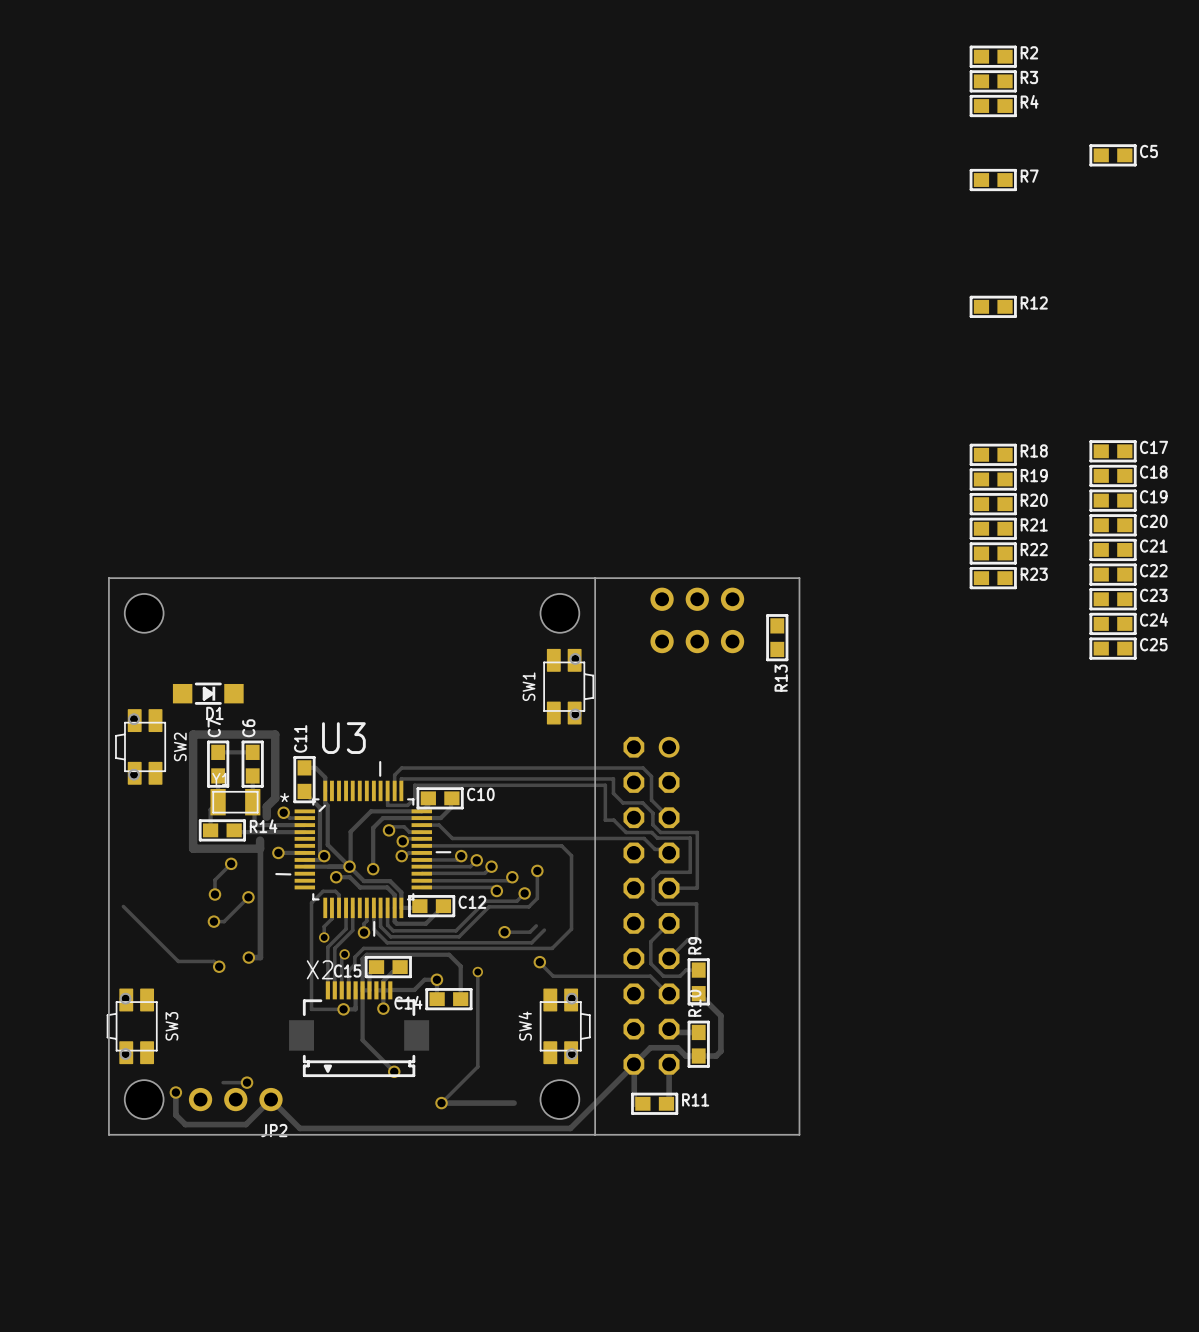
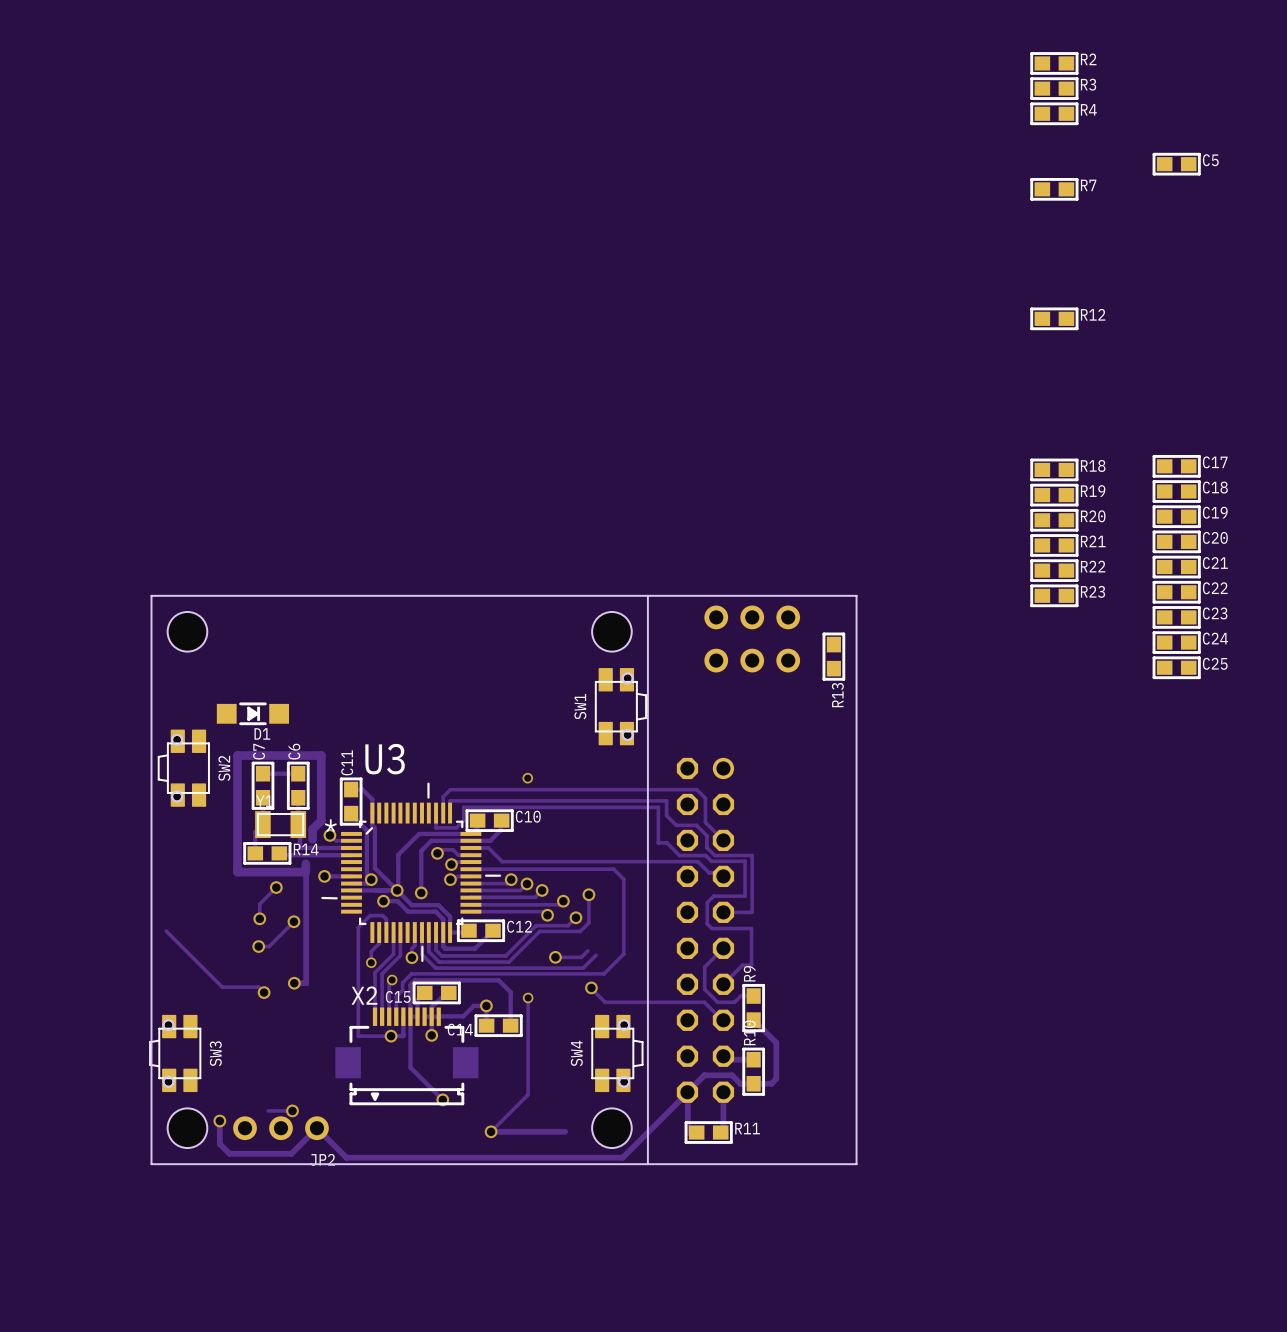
via: none -> (527, 778)

